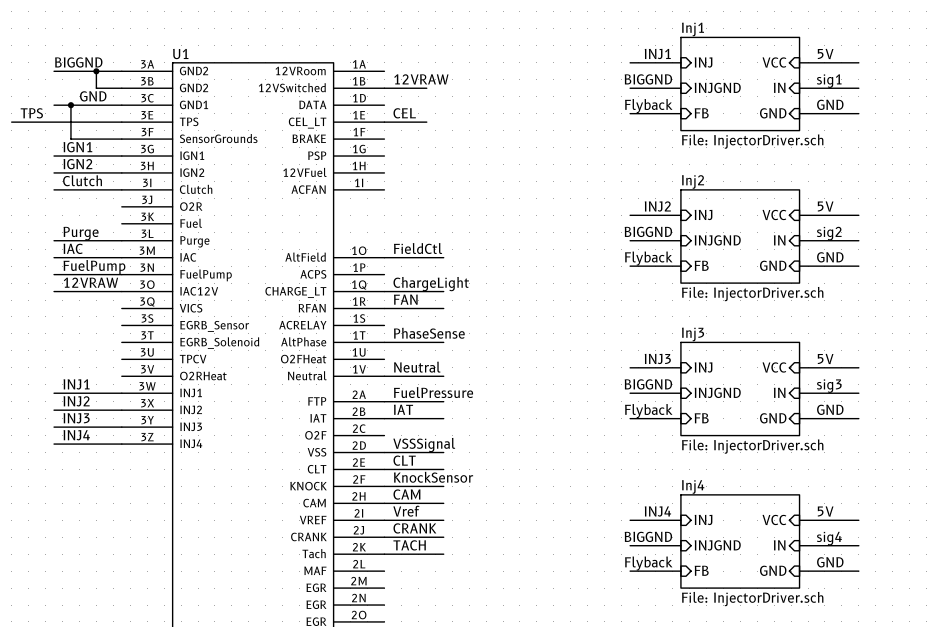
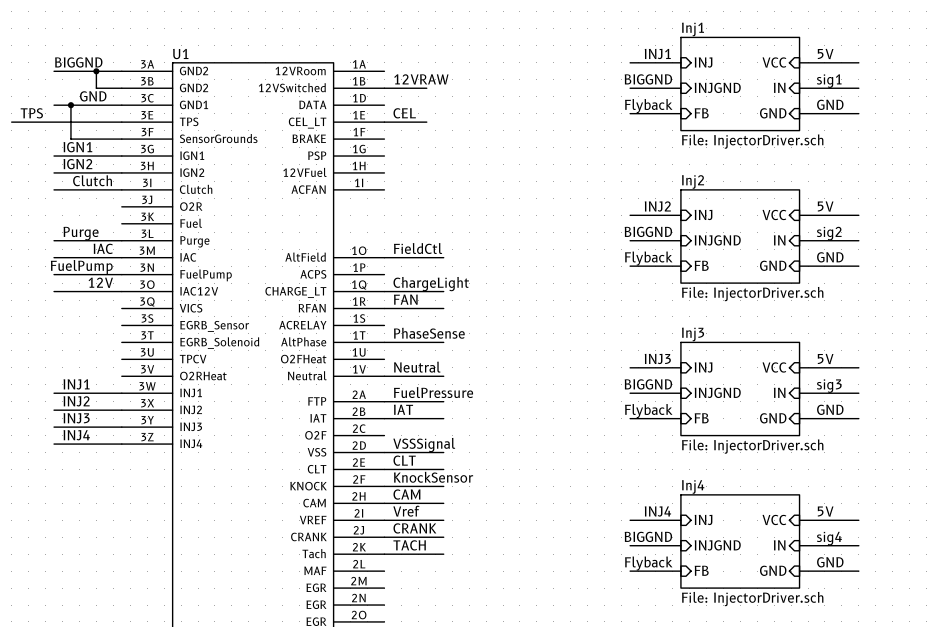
label position: Clutch (82, 180) -> Clutch (92, 180)
label position: IAC (73, 248) -> IAC (103, 248)
label position: FuelPump (94, 267) -> FuelPump (81, 267)
label: 12VRAW (90, 282) -> 12V (100, 282)

